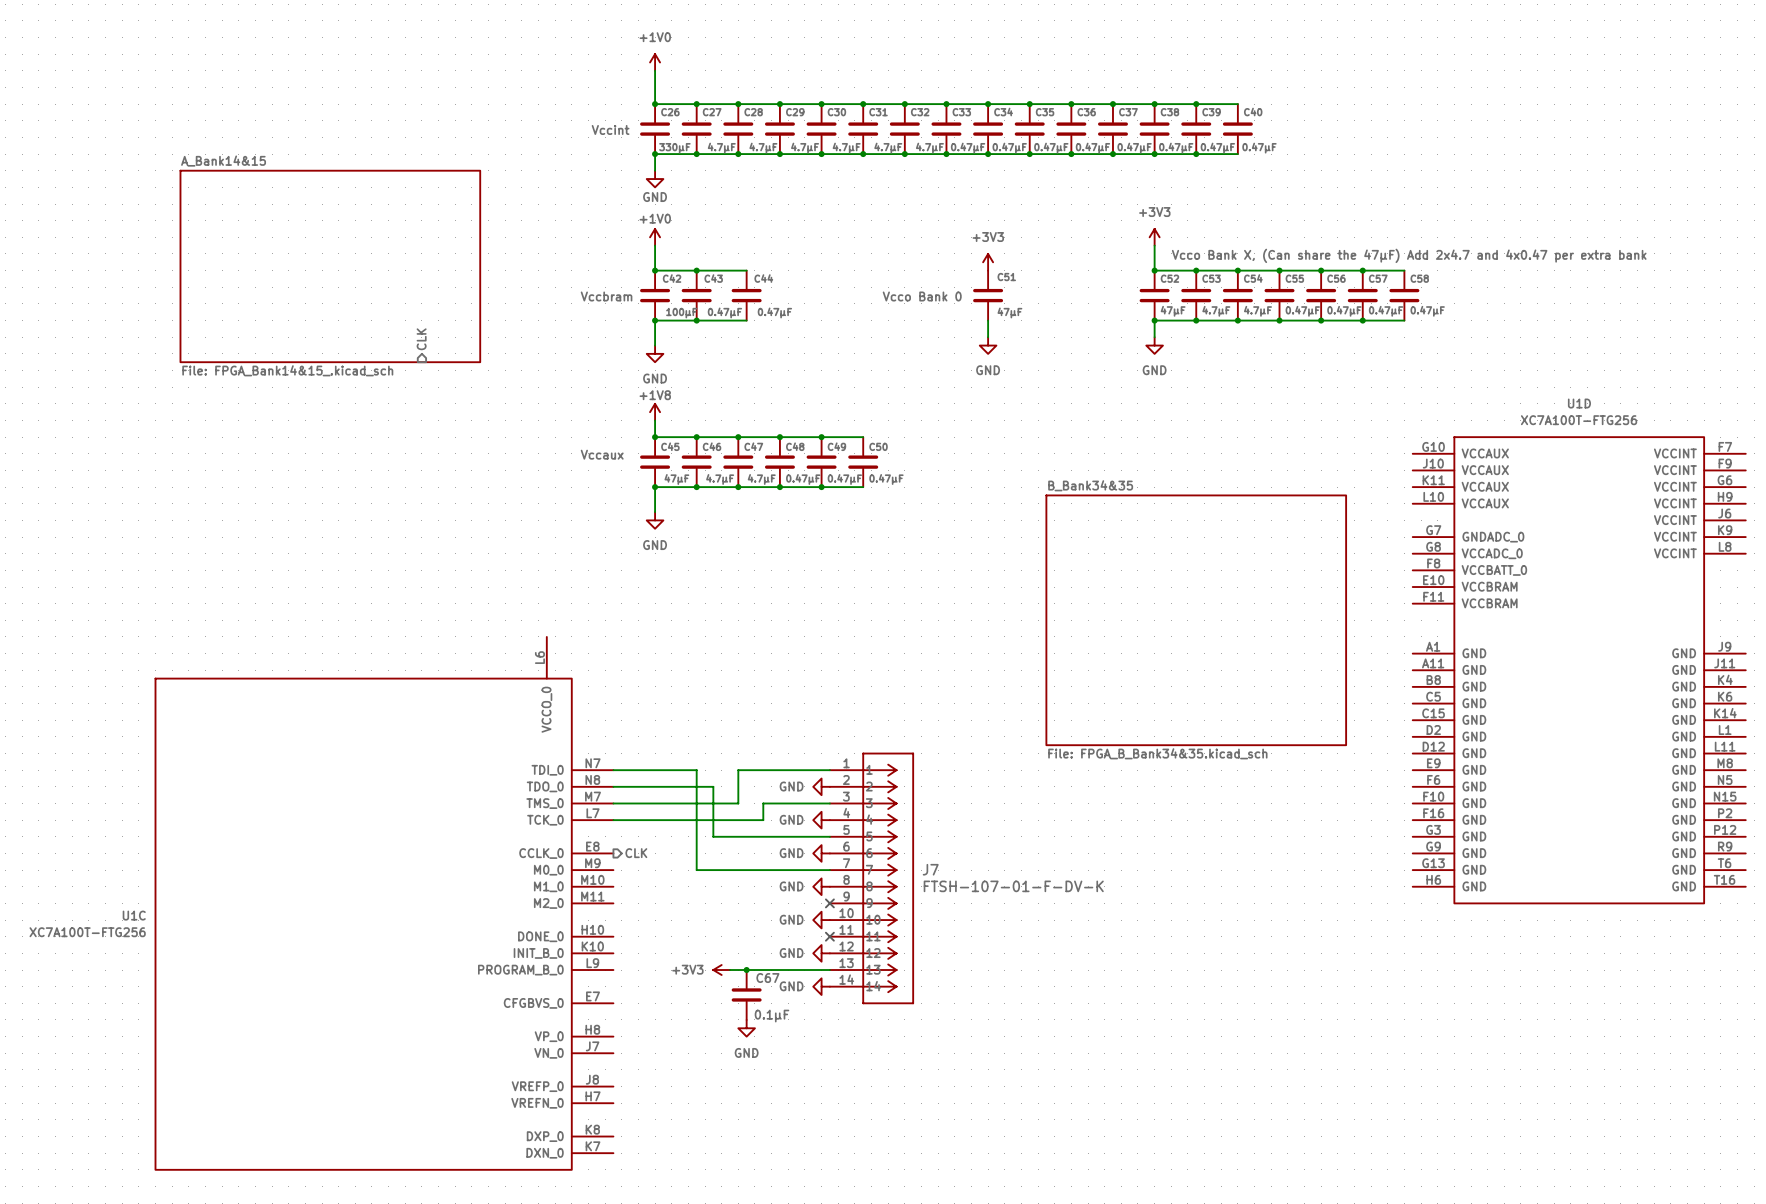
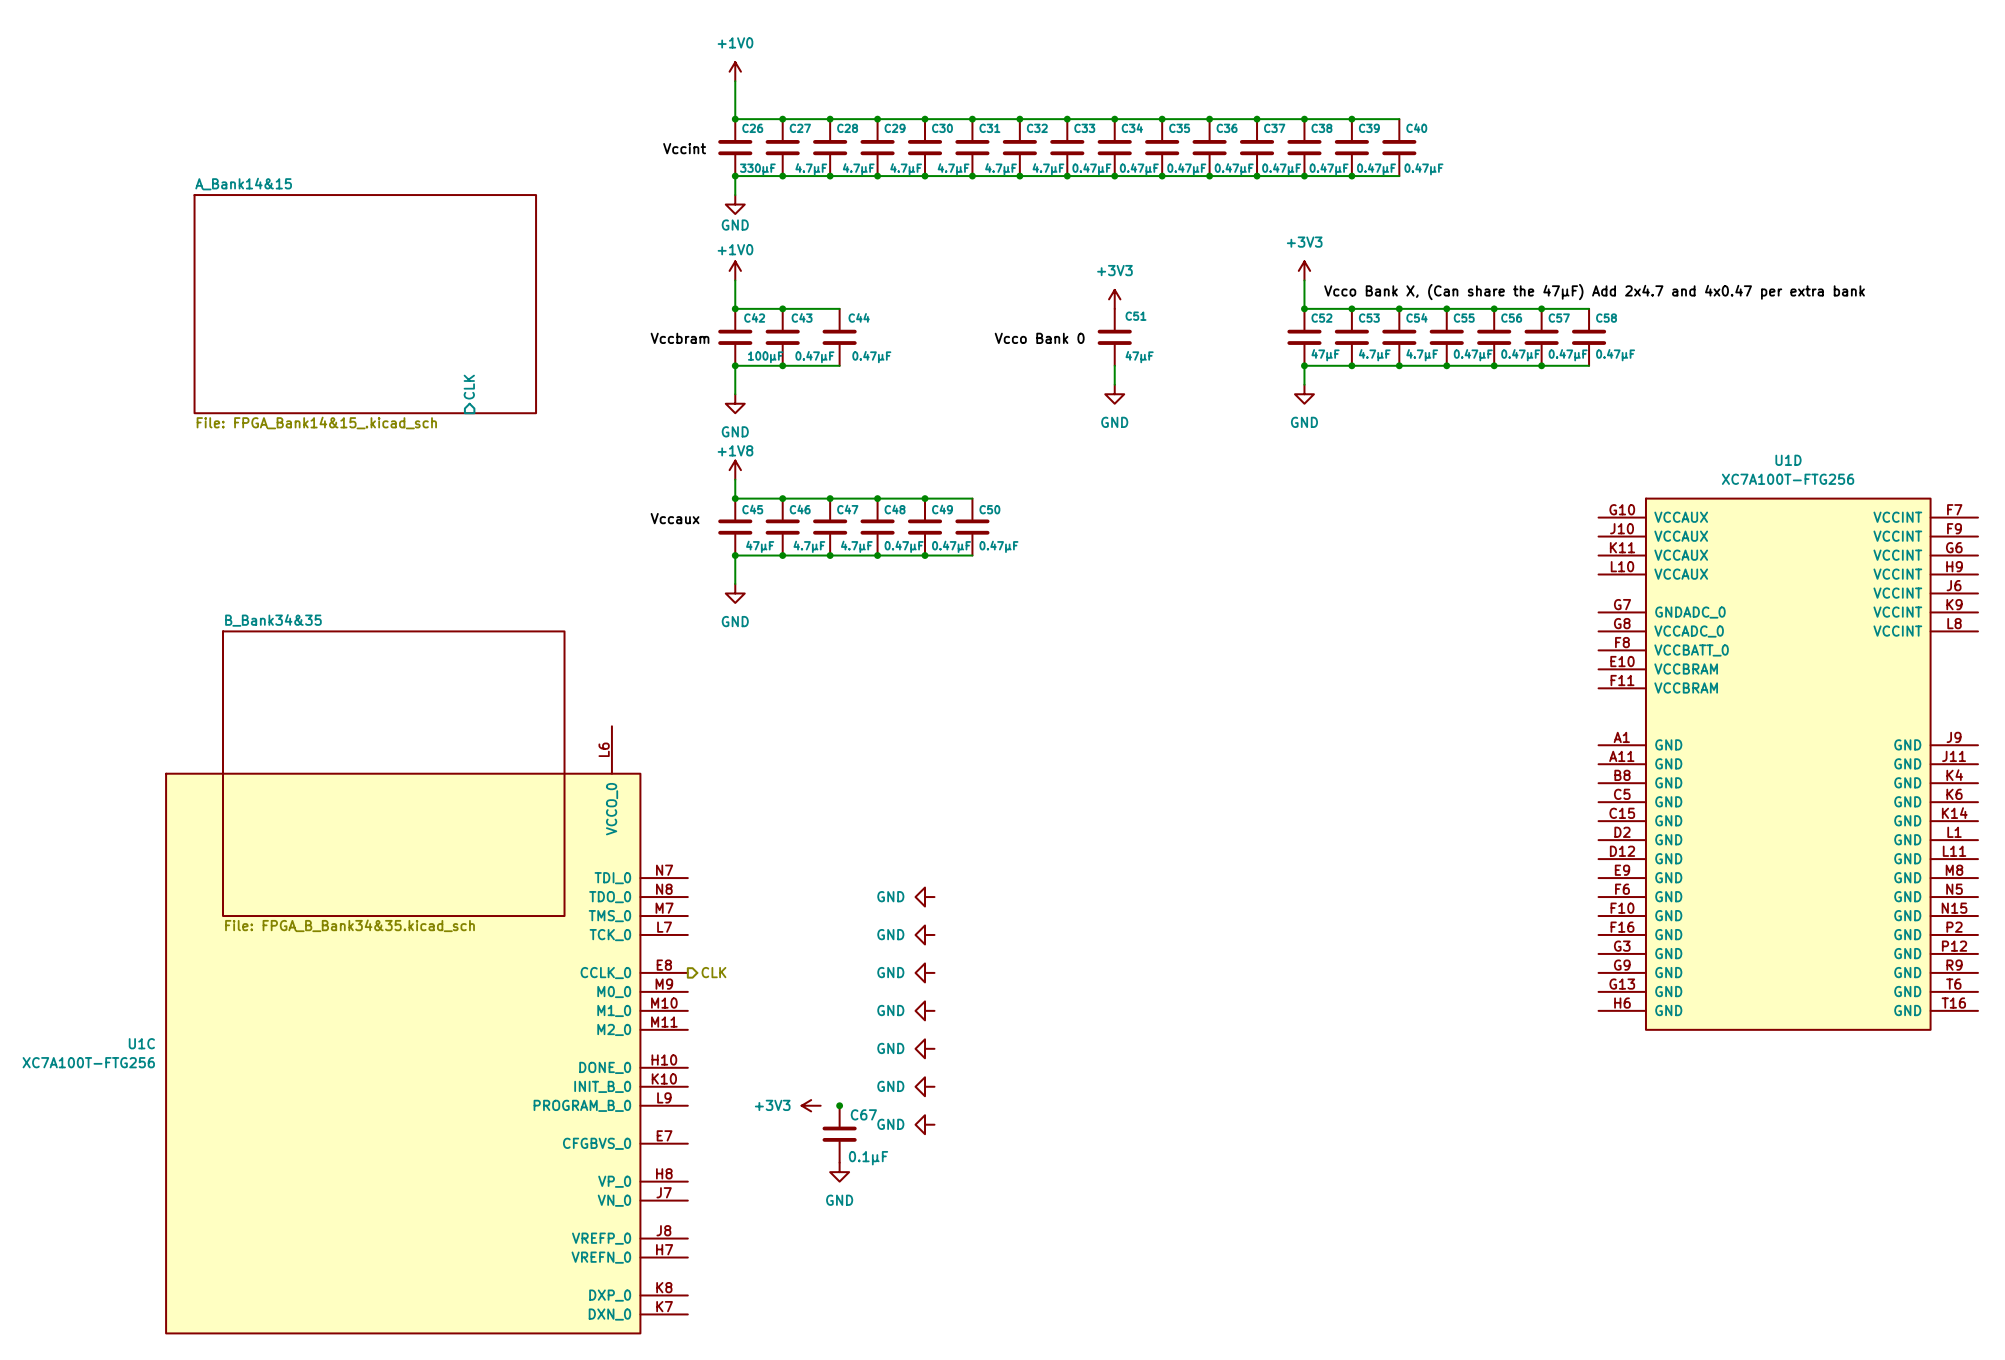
sheet B_Bank34&35 position: (1196, 620) -> (393, 773)
wire: (613, 770) (696, 770) (696, 870) (829, 870) -> none
wire: (829, 770) (738, 770) (738, 803) (613, 803) -> none
wire: (613, 786) (713, 786) (713, 836) (829, 836) -> none
wire: (829, 803) (763, 803) (763, 820) (613, 820) -> none
J7: FTSH-107-01-F-DV-K (871, 878) -> none
no-connect mark: (829, 903) -> none
no-connect mark: (829, 936) -> none
wire: (729, 970) (829, 970) -> none

